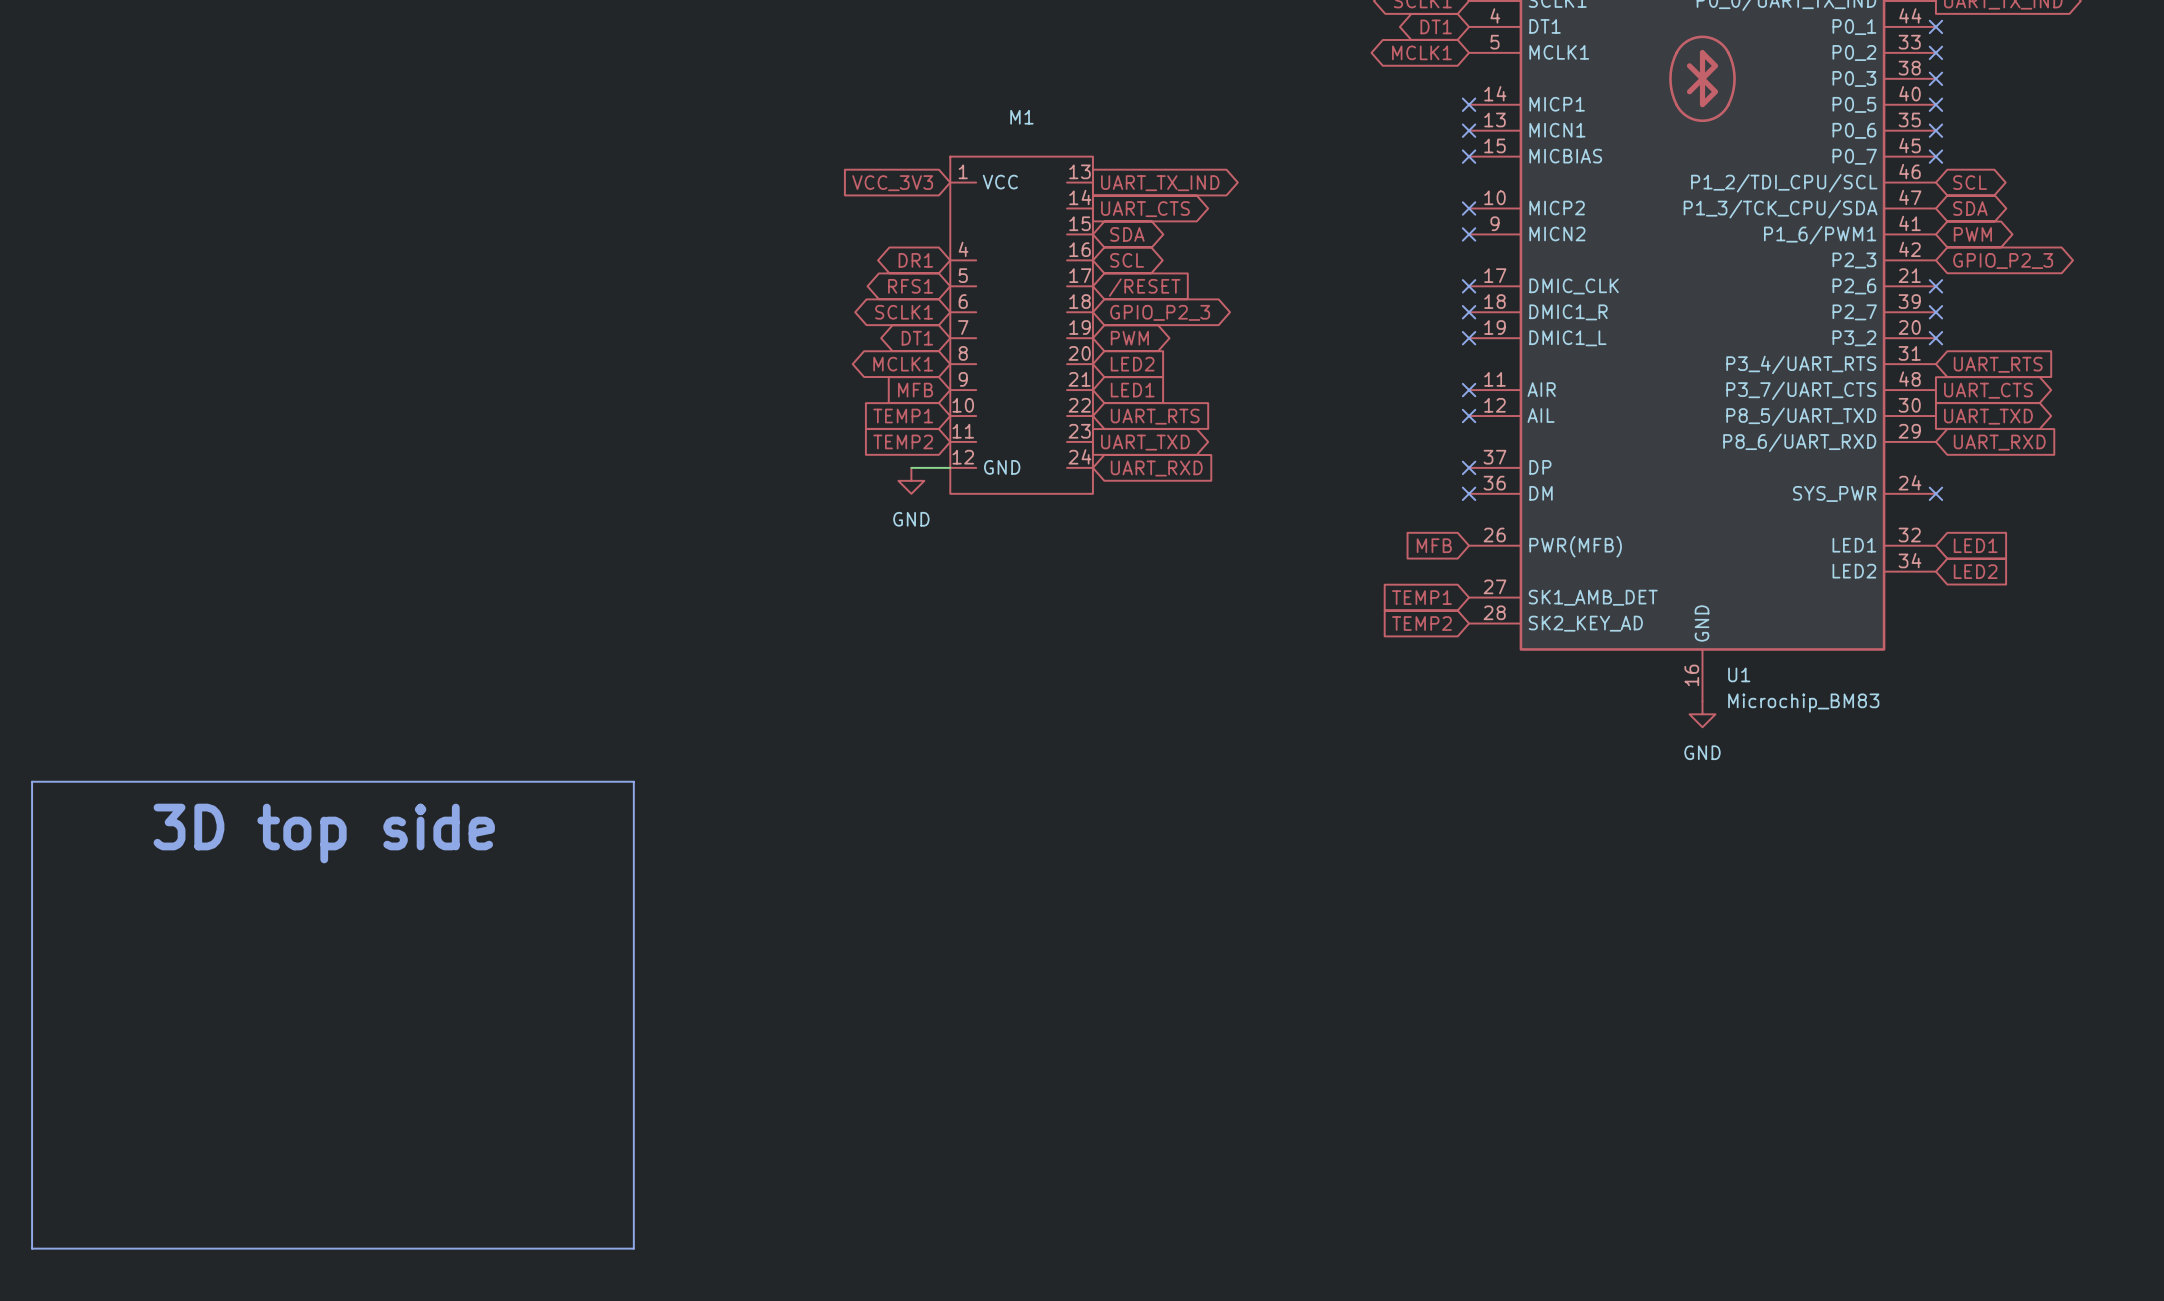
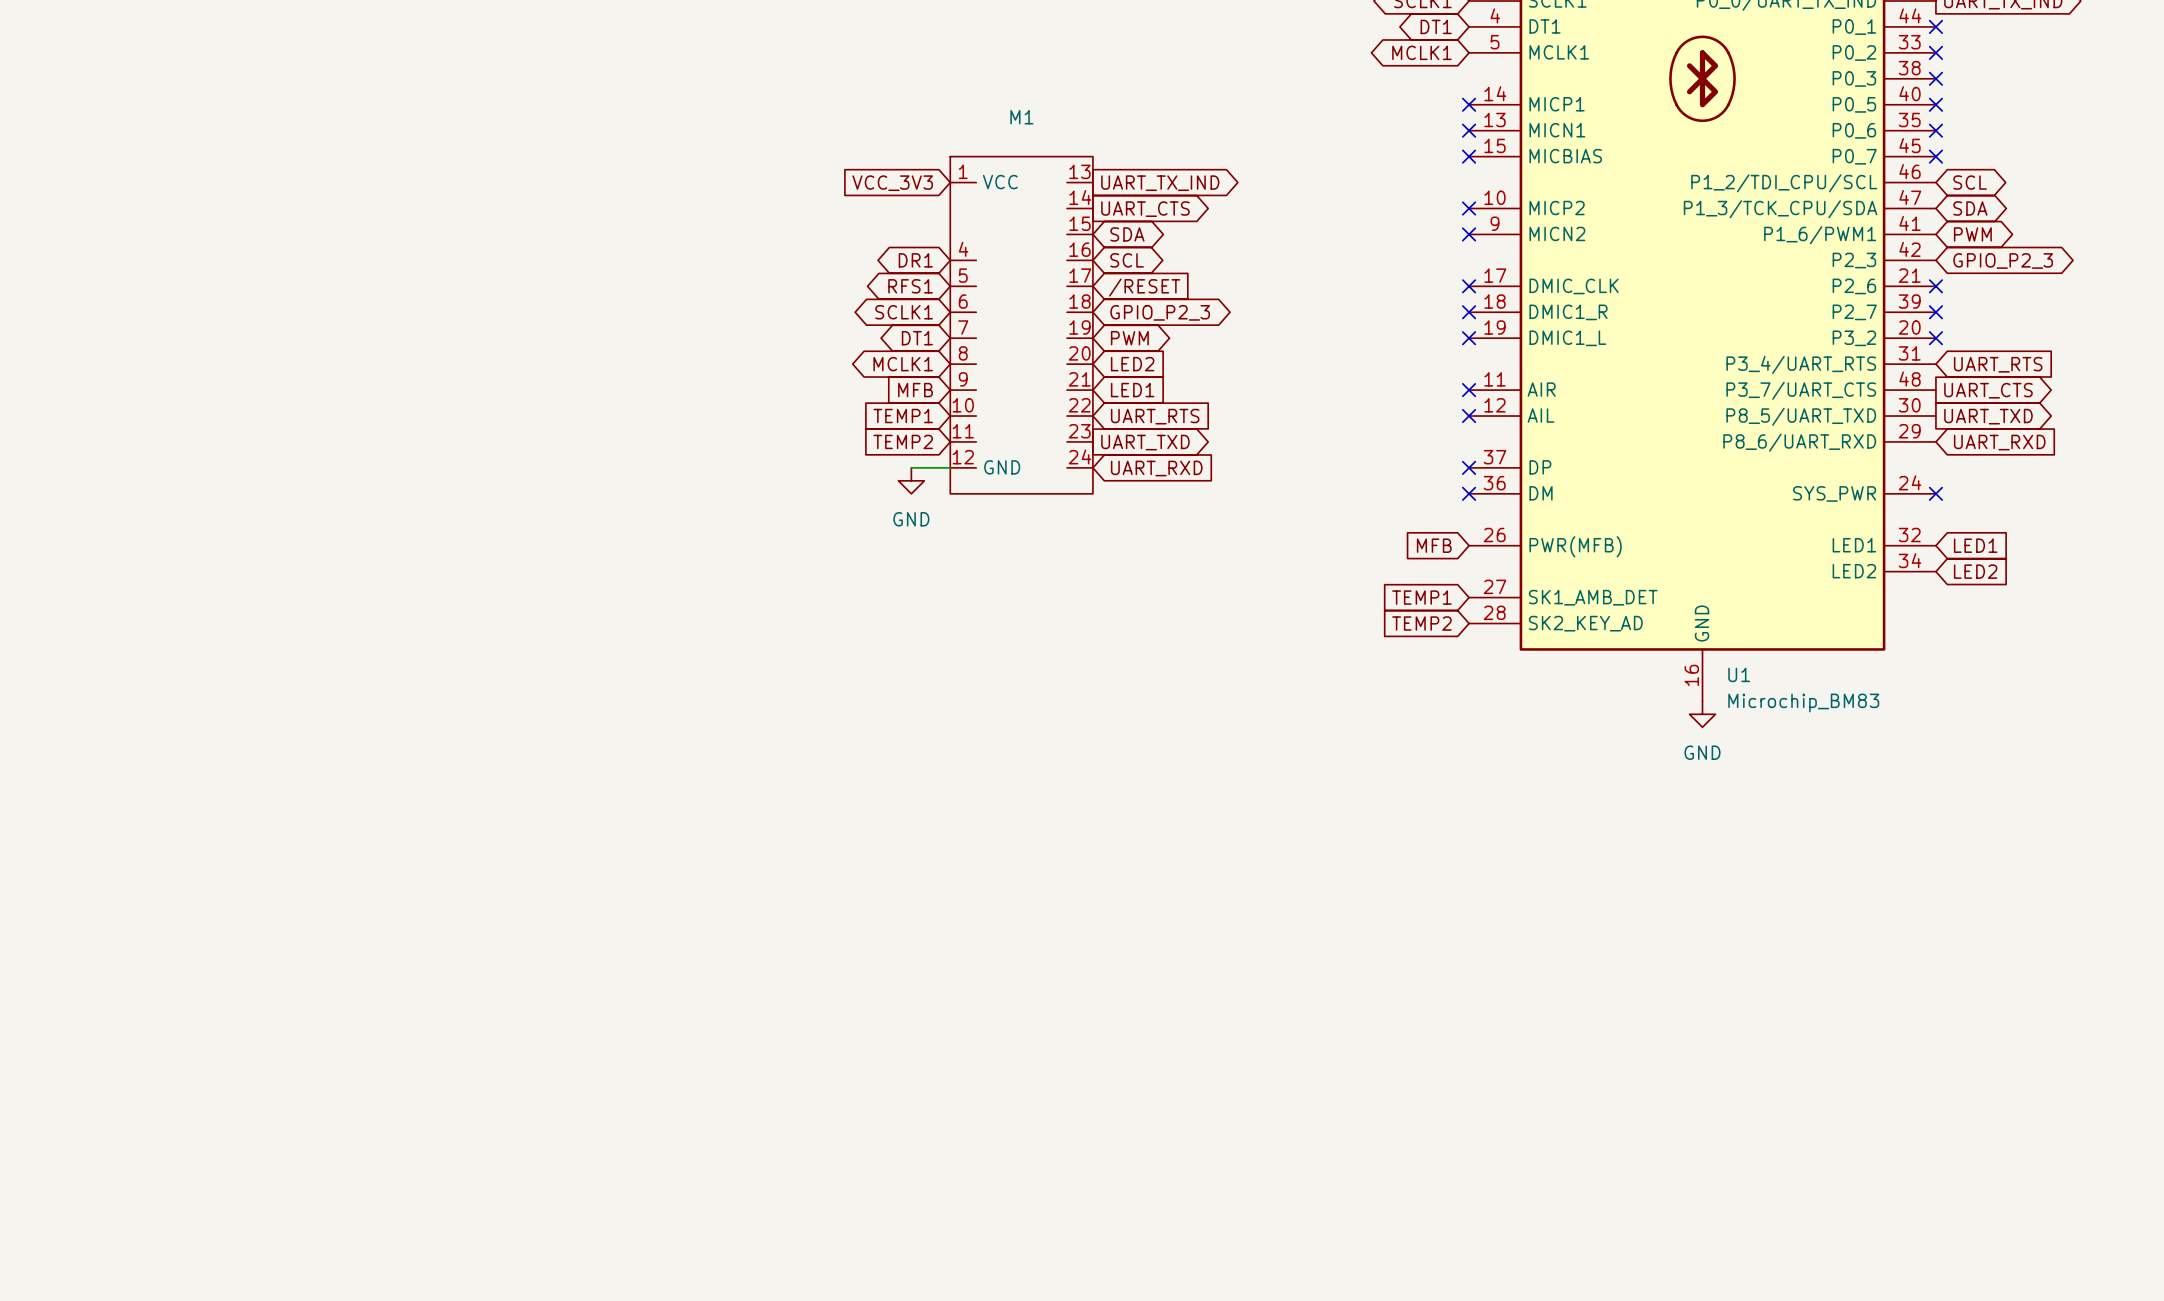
line: (32, 781) (633, 781) (633, 1248) (32, 1248) (32, 781) -> none
text: 3D top side (324, 833) -> none

